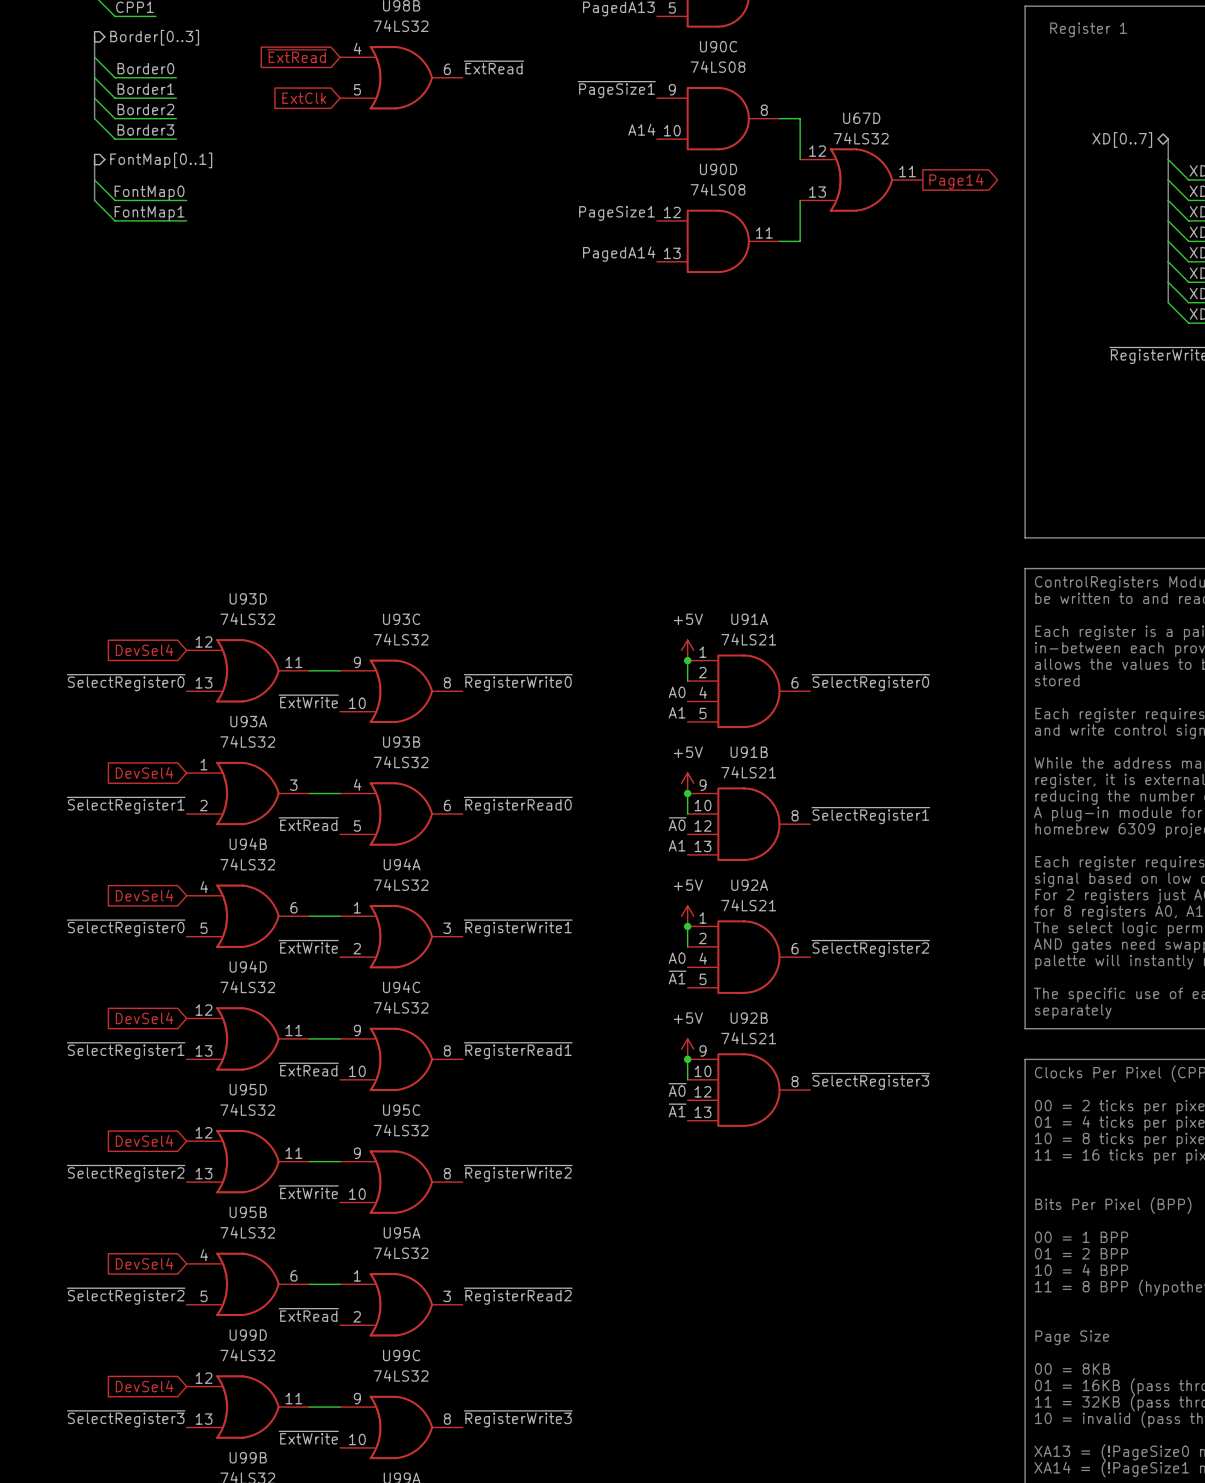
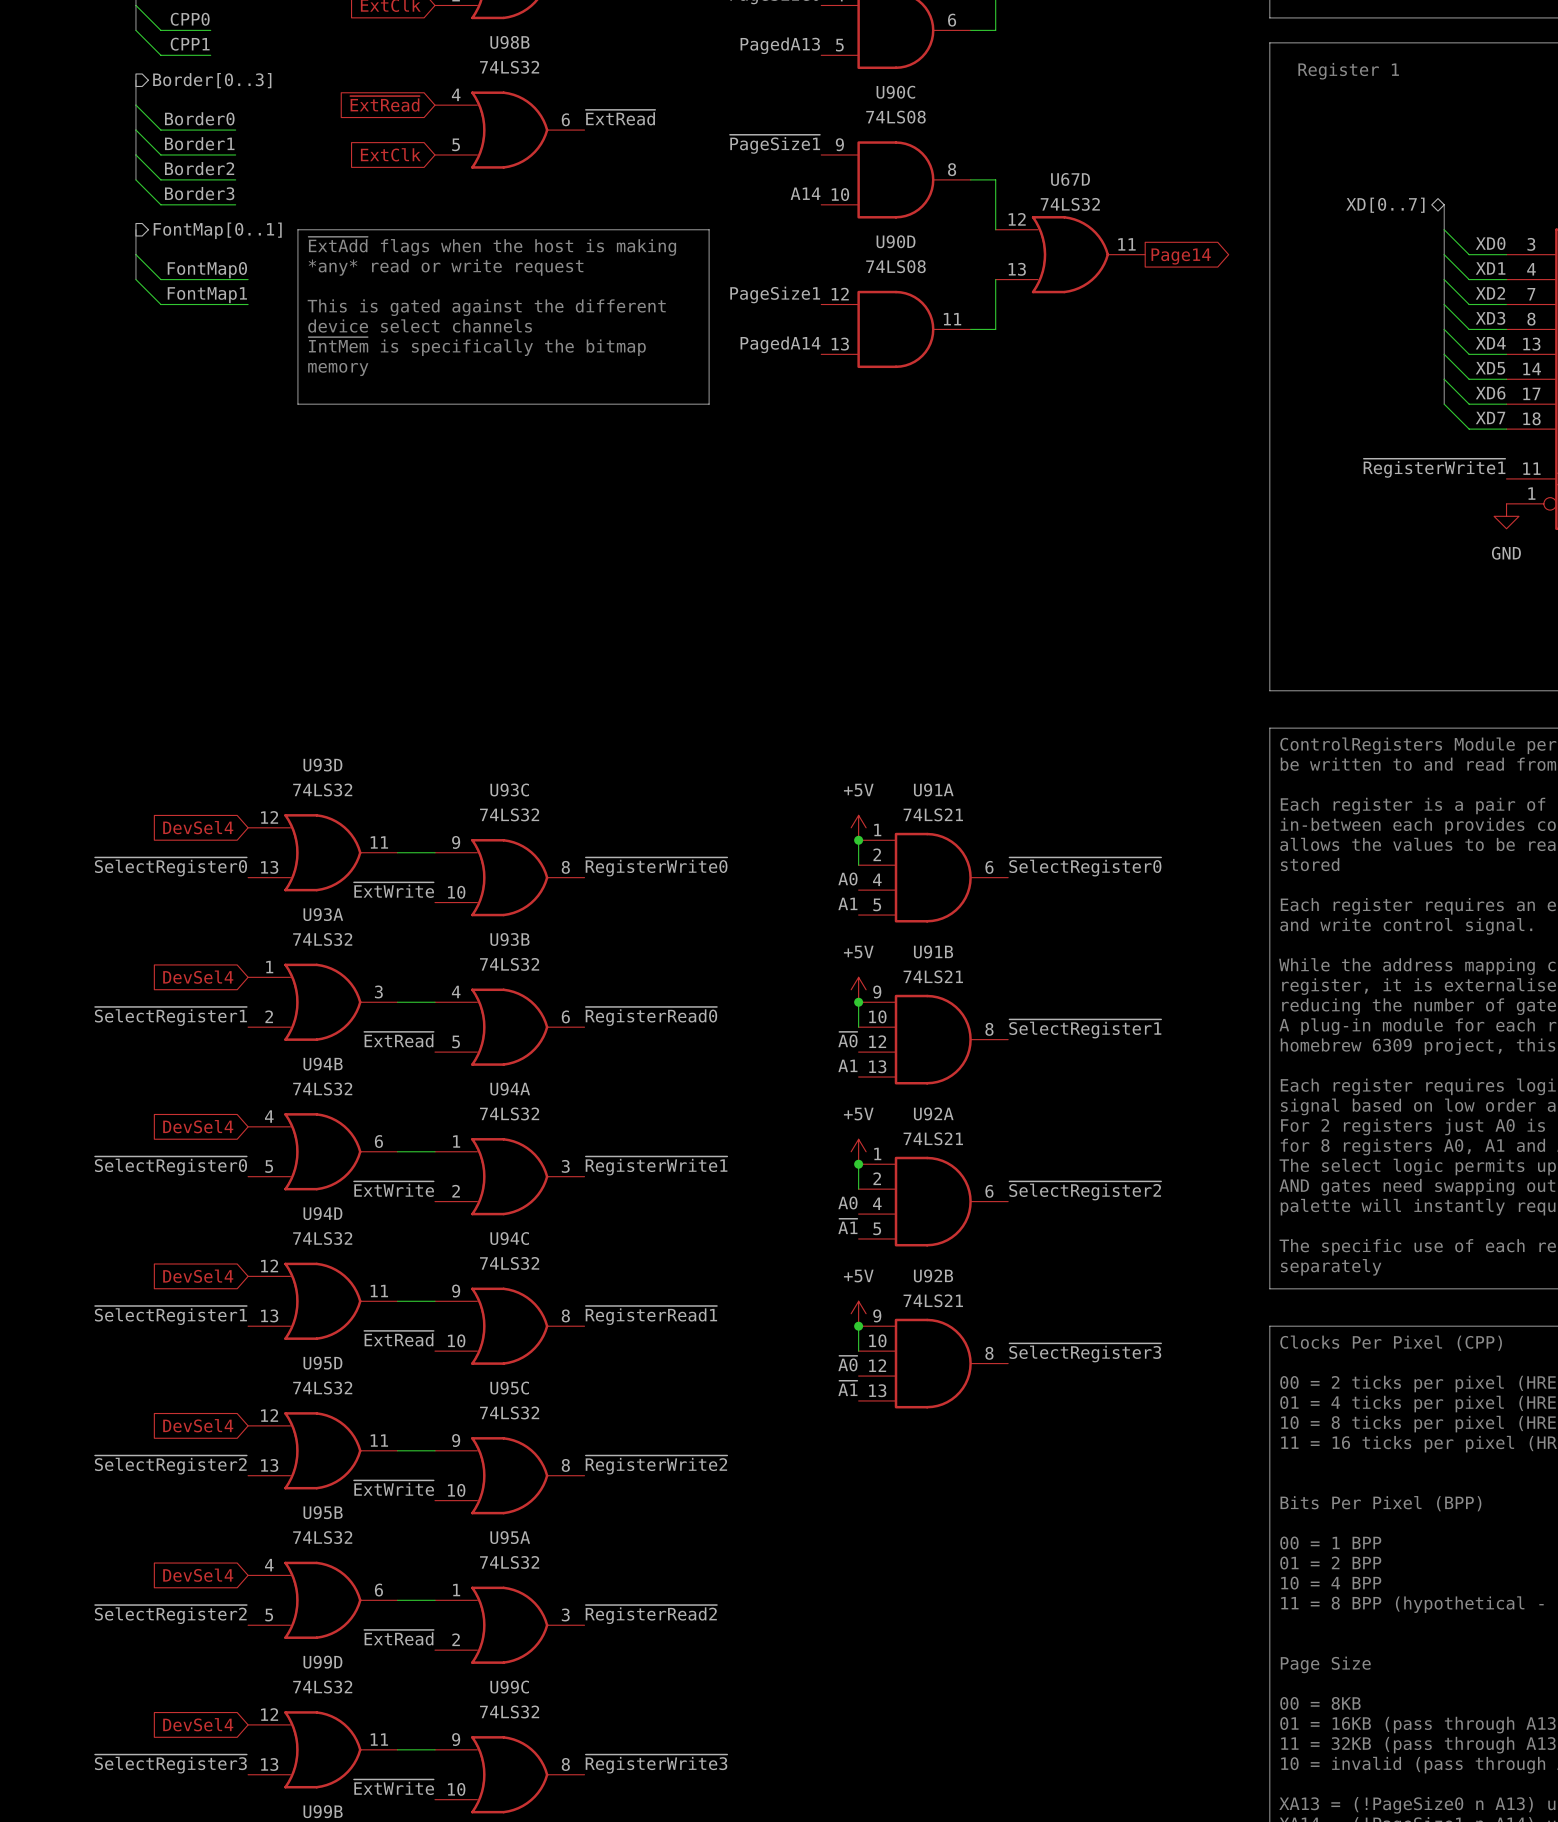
line: none -> (297, 229) (709, 229) (709, 404) (297, 404) (297, 229)
text: none -> ~{ExtAdd} flags when the host is making (492, 246)
text: none -> *any* read or write request (446, 267)
text: none -> This is gated against the different (486, 307)
text: none -> device select channels (420, 325)
text: none -> ~{IntMem} is specifically the bitmap (477, 346)
text: none -> memory (338, 369)

